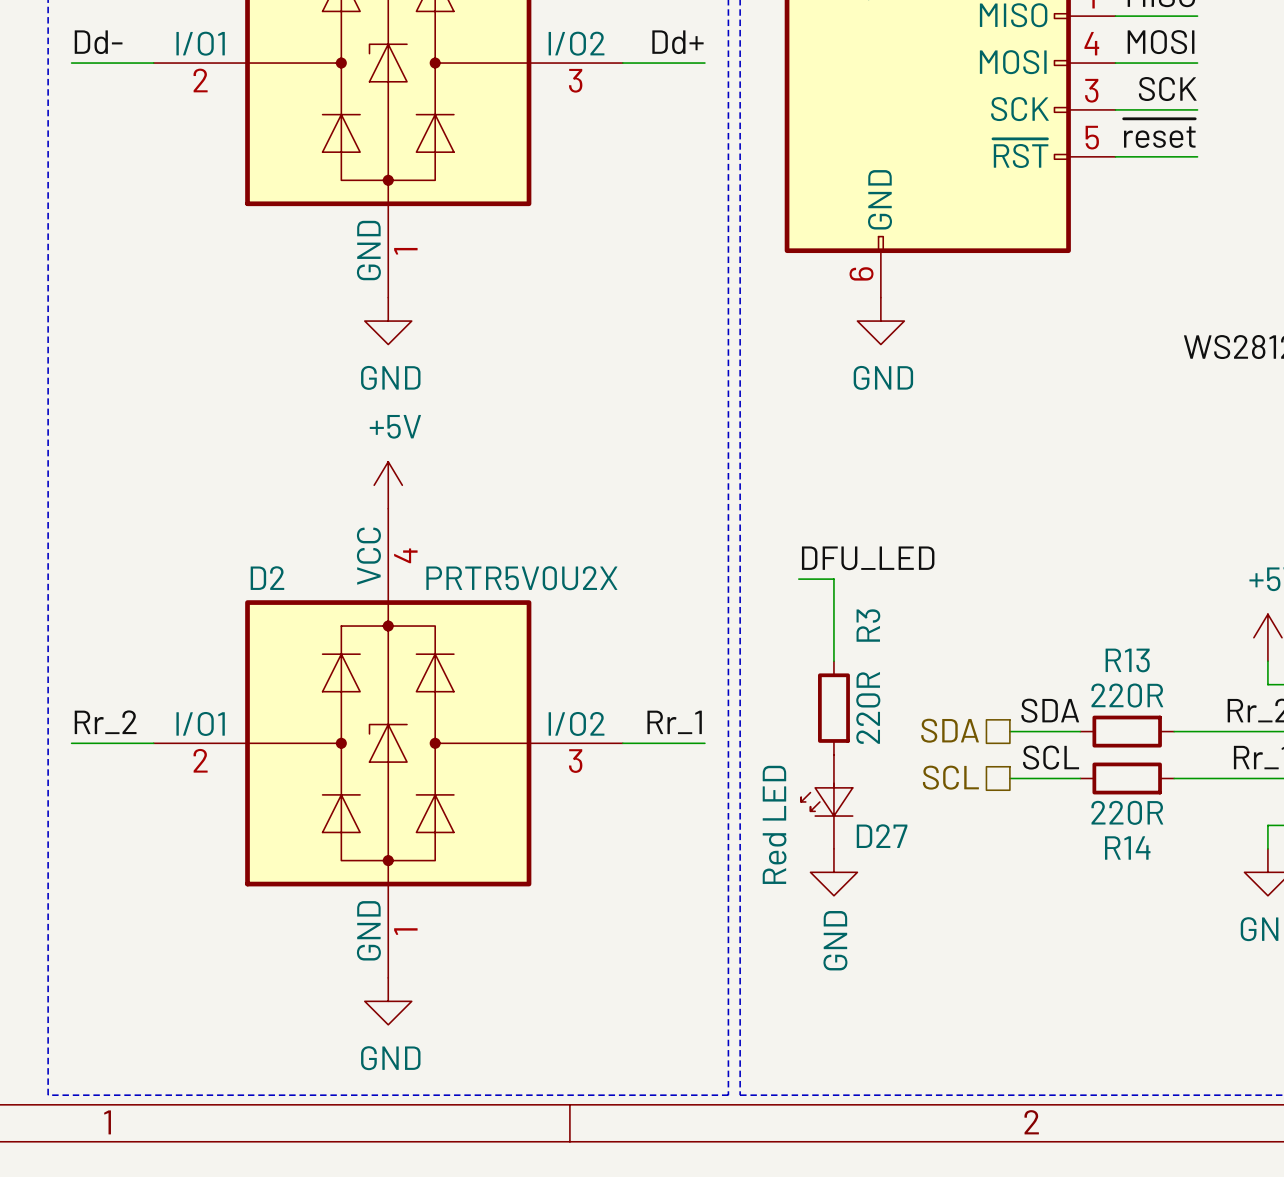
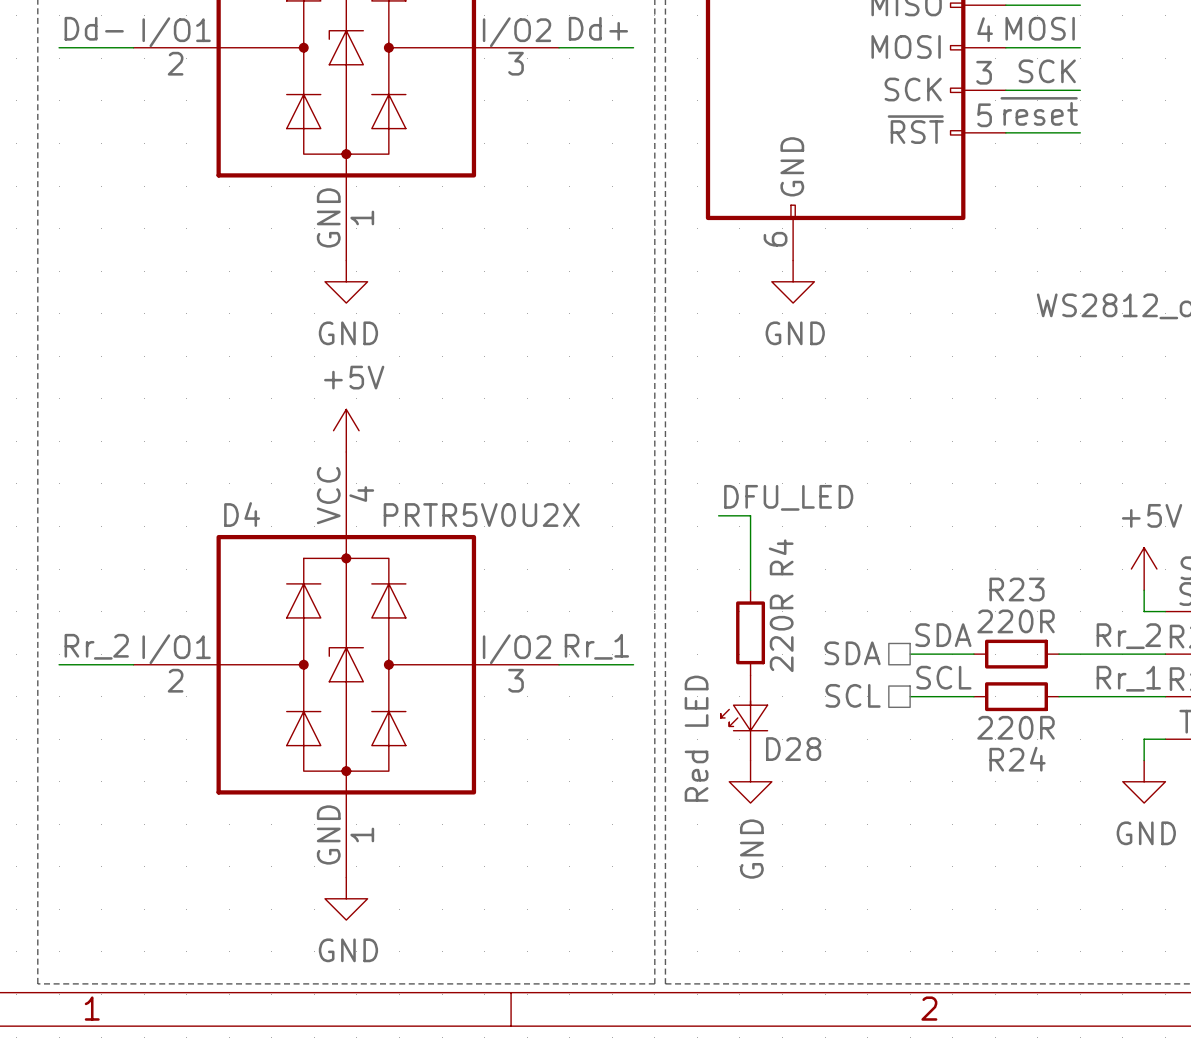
D2 name: D2 (267, 578) -> D4 (242, 514)
R3 name: R3 (868, 625) -> R4 (781, 557)
R13 name: R13 (1127, 660) -> R23 (1017, 589)
D27 name: D27 (882, 836) -> D28 (793, 749)
R14 name: R14 (1127, 847) -> R24 (1017, 759)

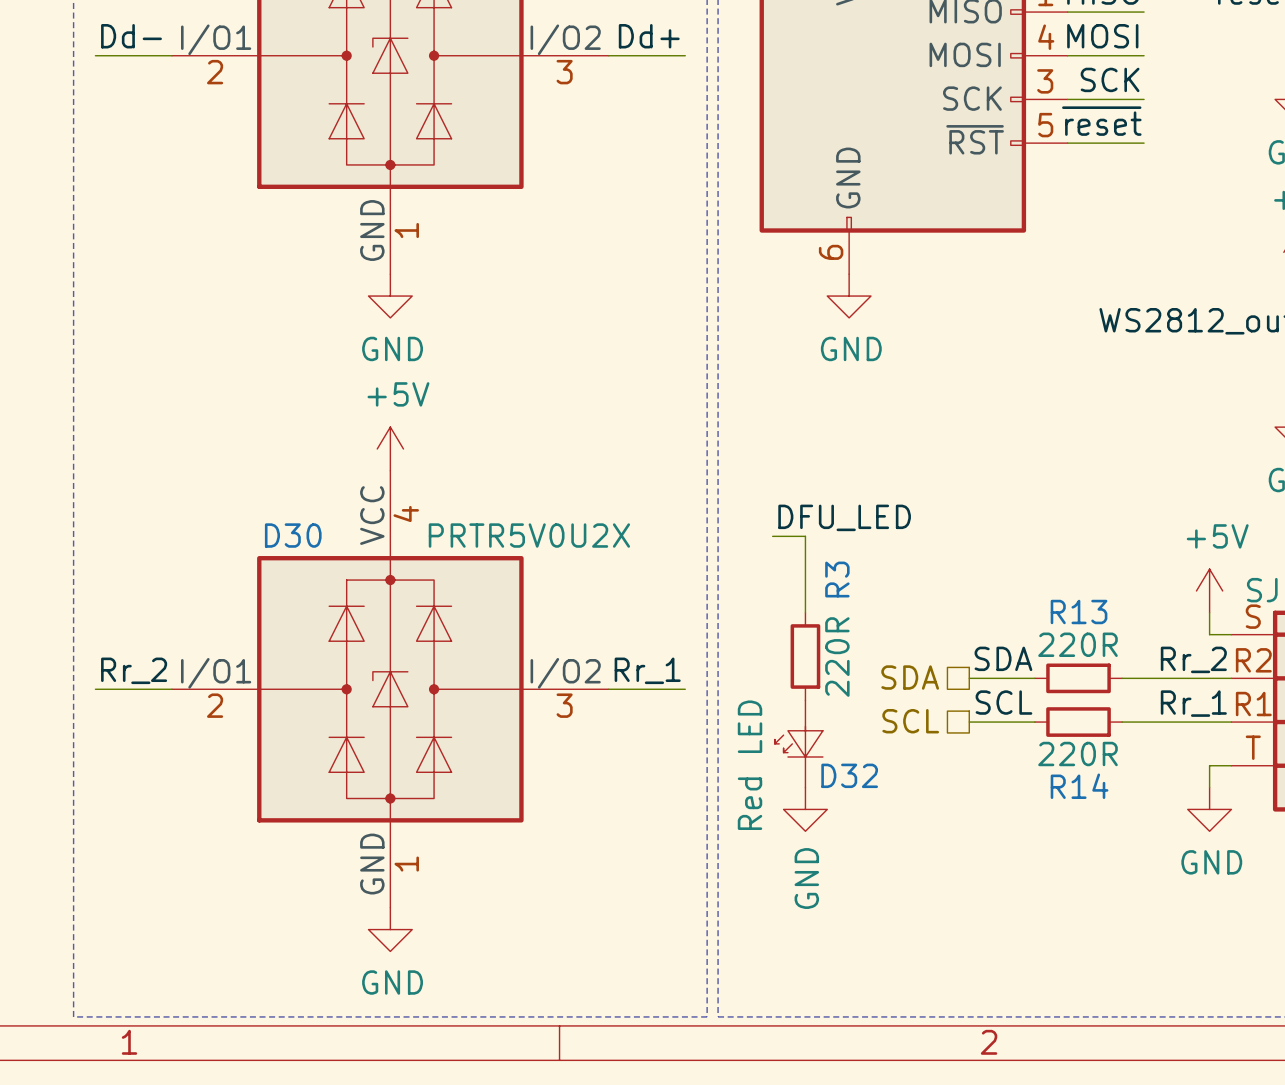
D4 name: D4 (242, 514) -> D30 (293, 535)
R4 name: R4 (781, 557) -> R3 (837, 579)
R23 name: R23 (1017, 589) -> R13 (1079, 611)
D28 name: D28 (793, 749) -> D32 (849, 775)
R24 name: R24 (1017, 759) -> R14 (1079, 786)

